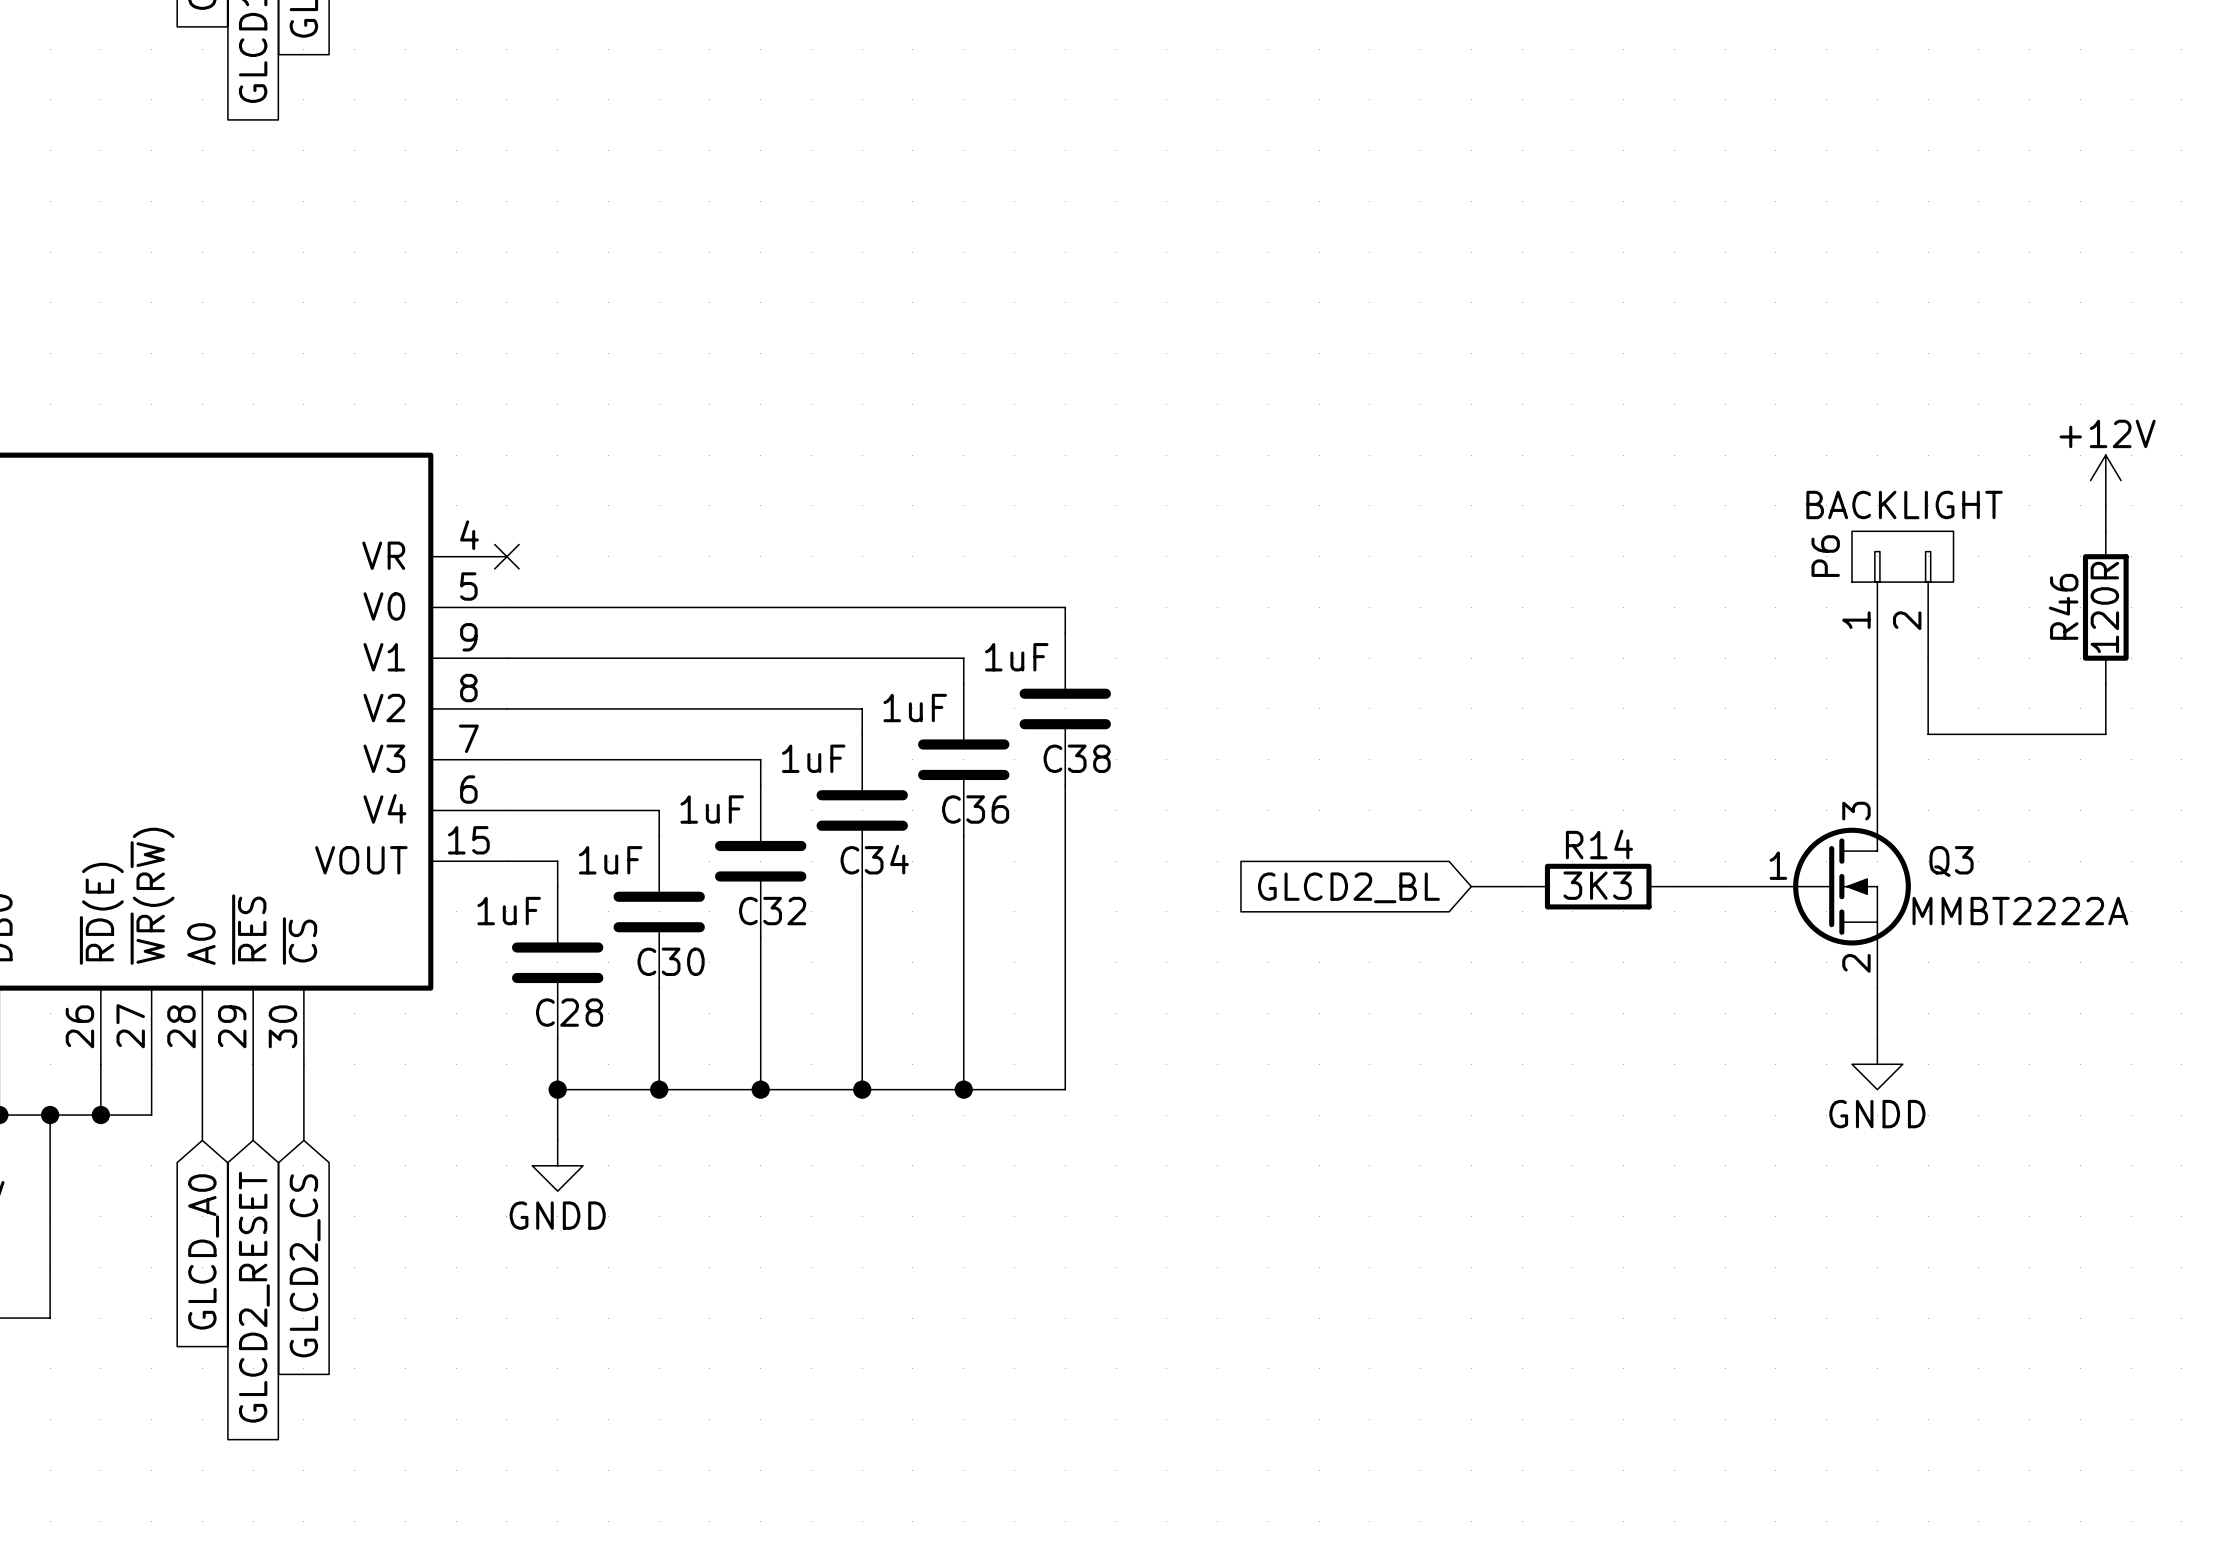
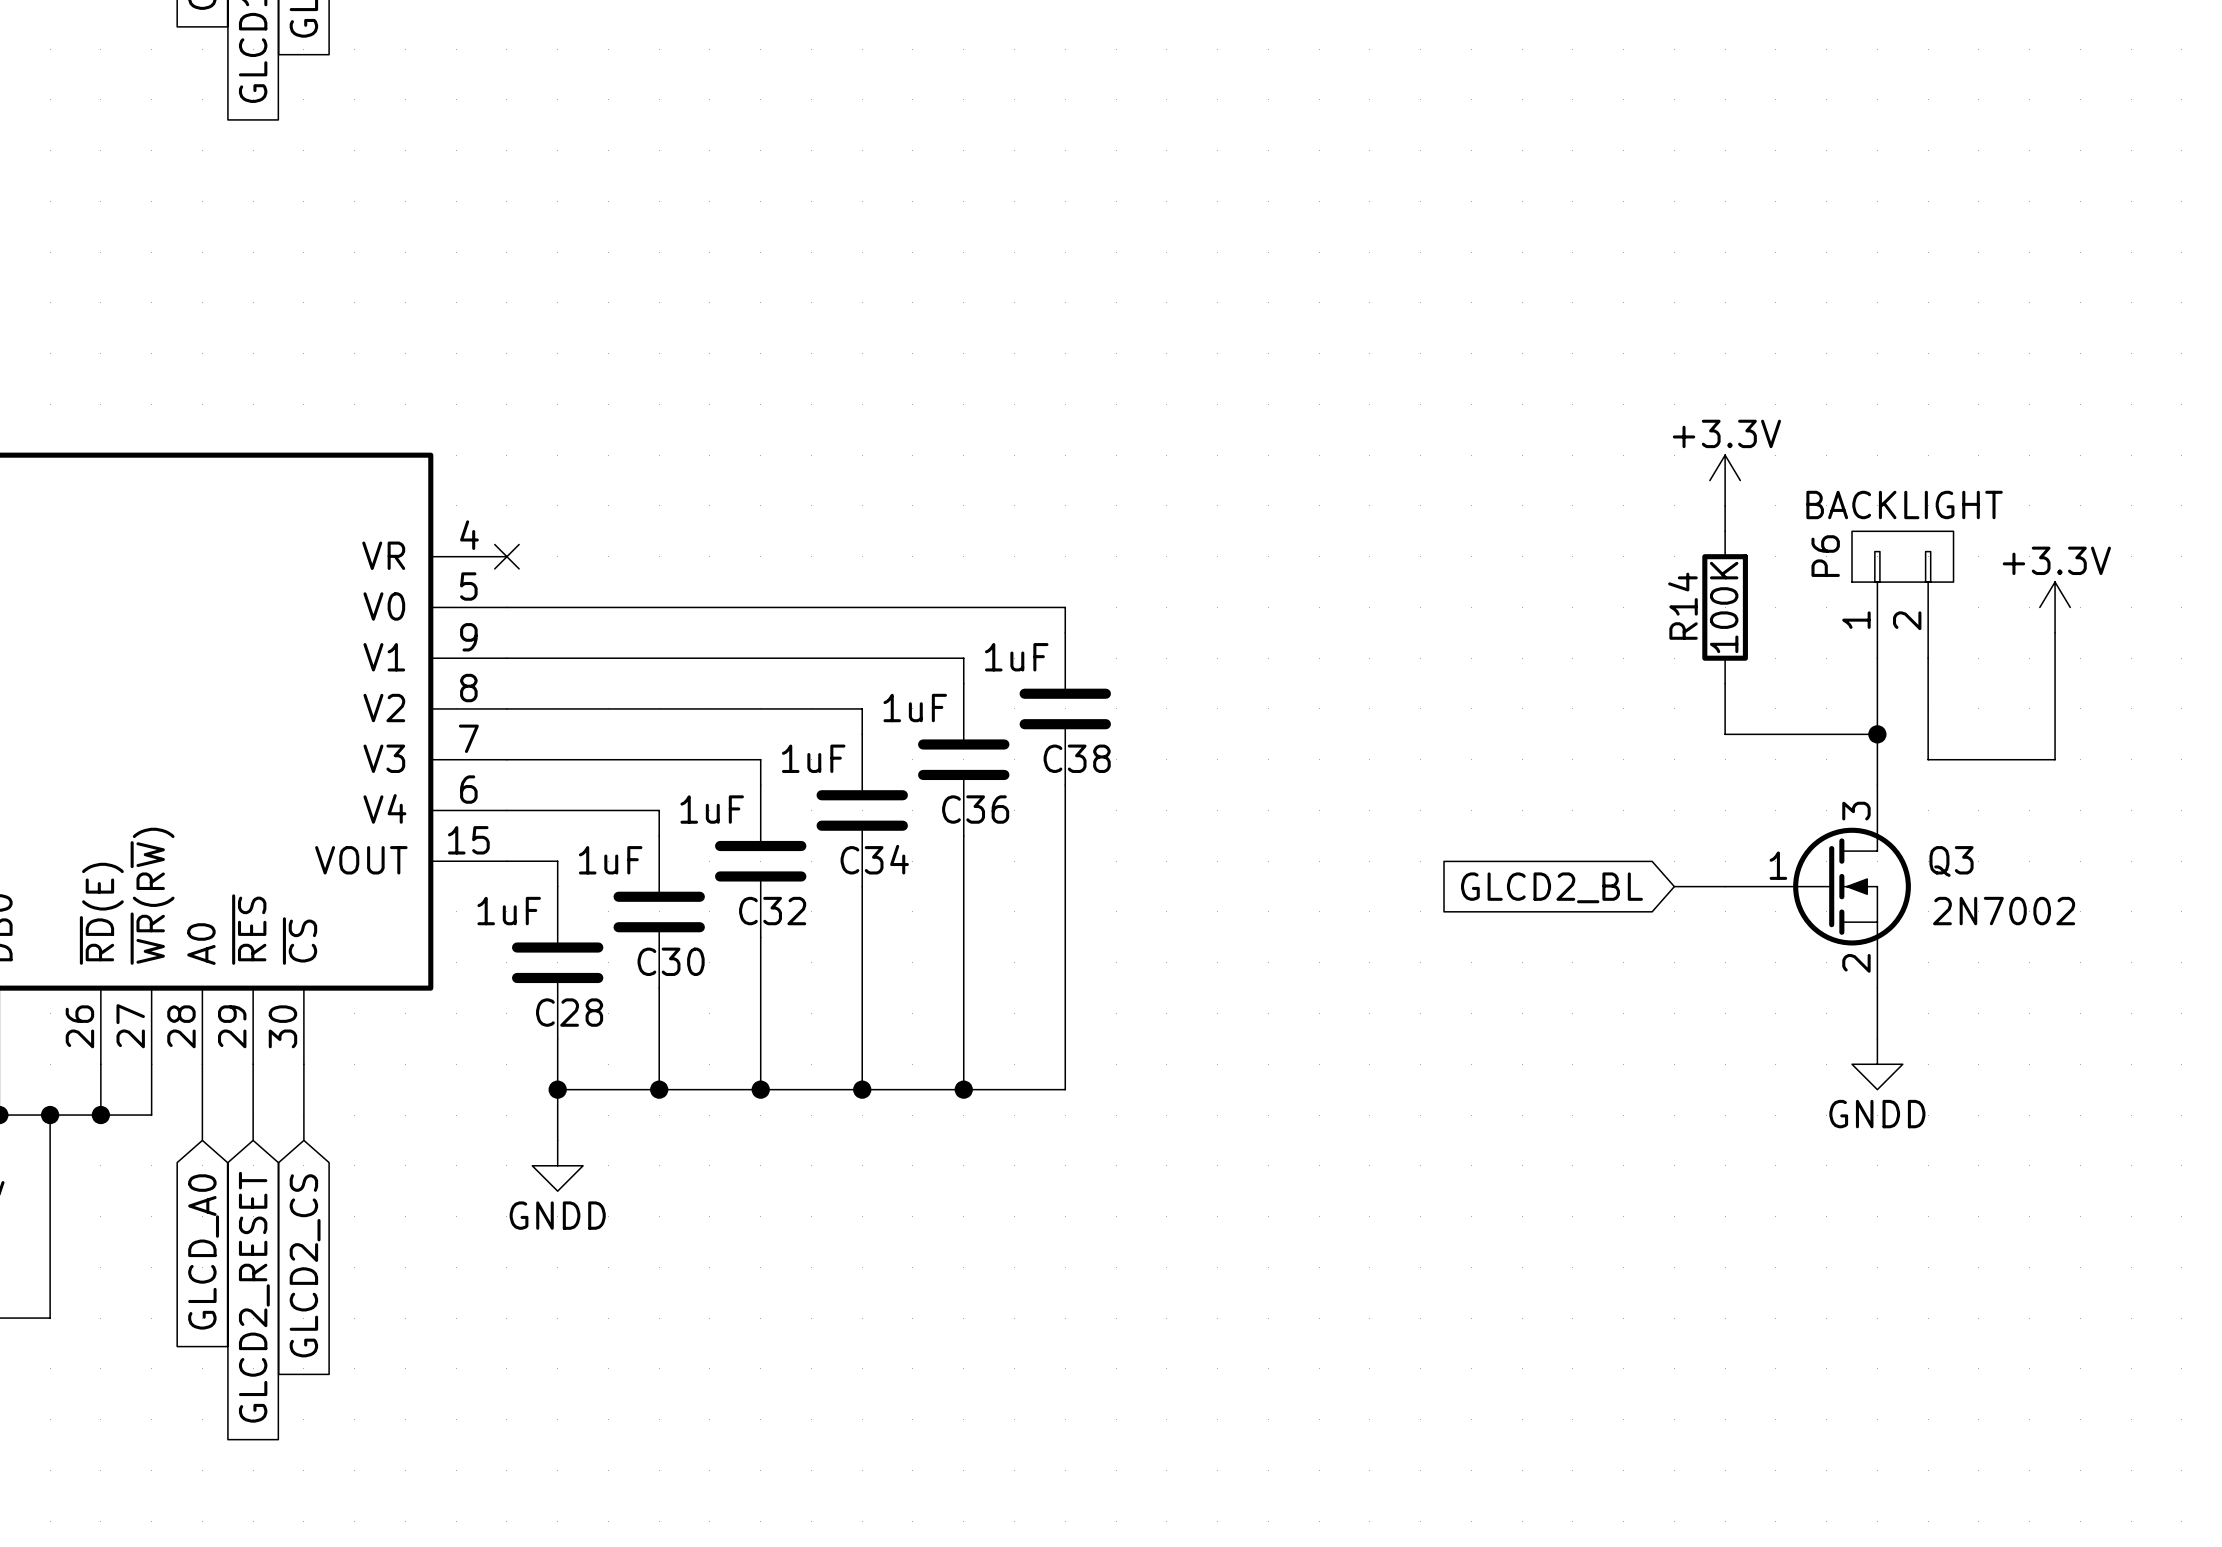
power symbol: none -> +3.3V (1725, 480)
power symbol: +12V (2105, 480) -> none
wire: (2105, 505) (2105, 531) -> (1725, 505) (1725, 531)
power symbol: none -> +3.3V (2055, 607)
R46: 120R (2105, 607) -> none
wire: none -> (1725, 683) (1725, 734) (1877, 734)
wire: (2105, 683) (2105, 734) (1928, 734) -> (2055, 632) (2055, 759) (1928, 759) (1928, 734)
junction: none -> (1877, 734)
R14 name position: R14 (1599, 844) -> R14 (1682, 606)
R14 value: 3K3 (1597, 885) -> 100K (1724, 607)
wire: (1471, 886) (1522, 886) -> none
R14 rotation: 0° (1598, 886) -> 90° clockwise (1725, 607)
R14 position: (1598, 886) -> (1725, 607)
global label position: GLCD2_BL (1348, 887) -> GLCD2_BL (1551, 887)
Q3 value: MMBT2222A (2020, 911) -> 2N7002 (2004, 911)

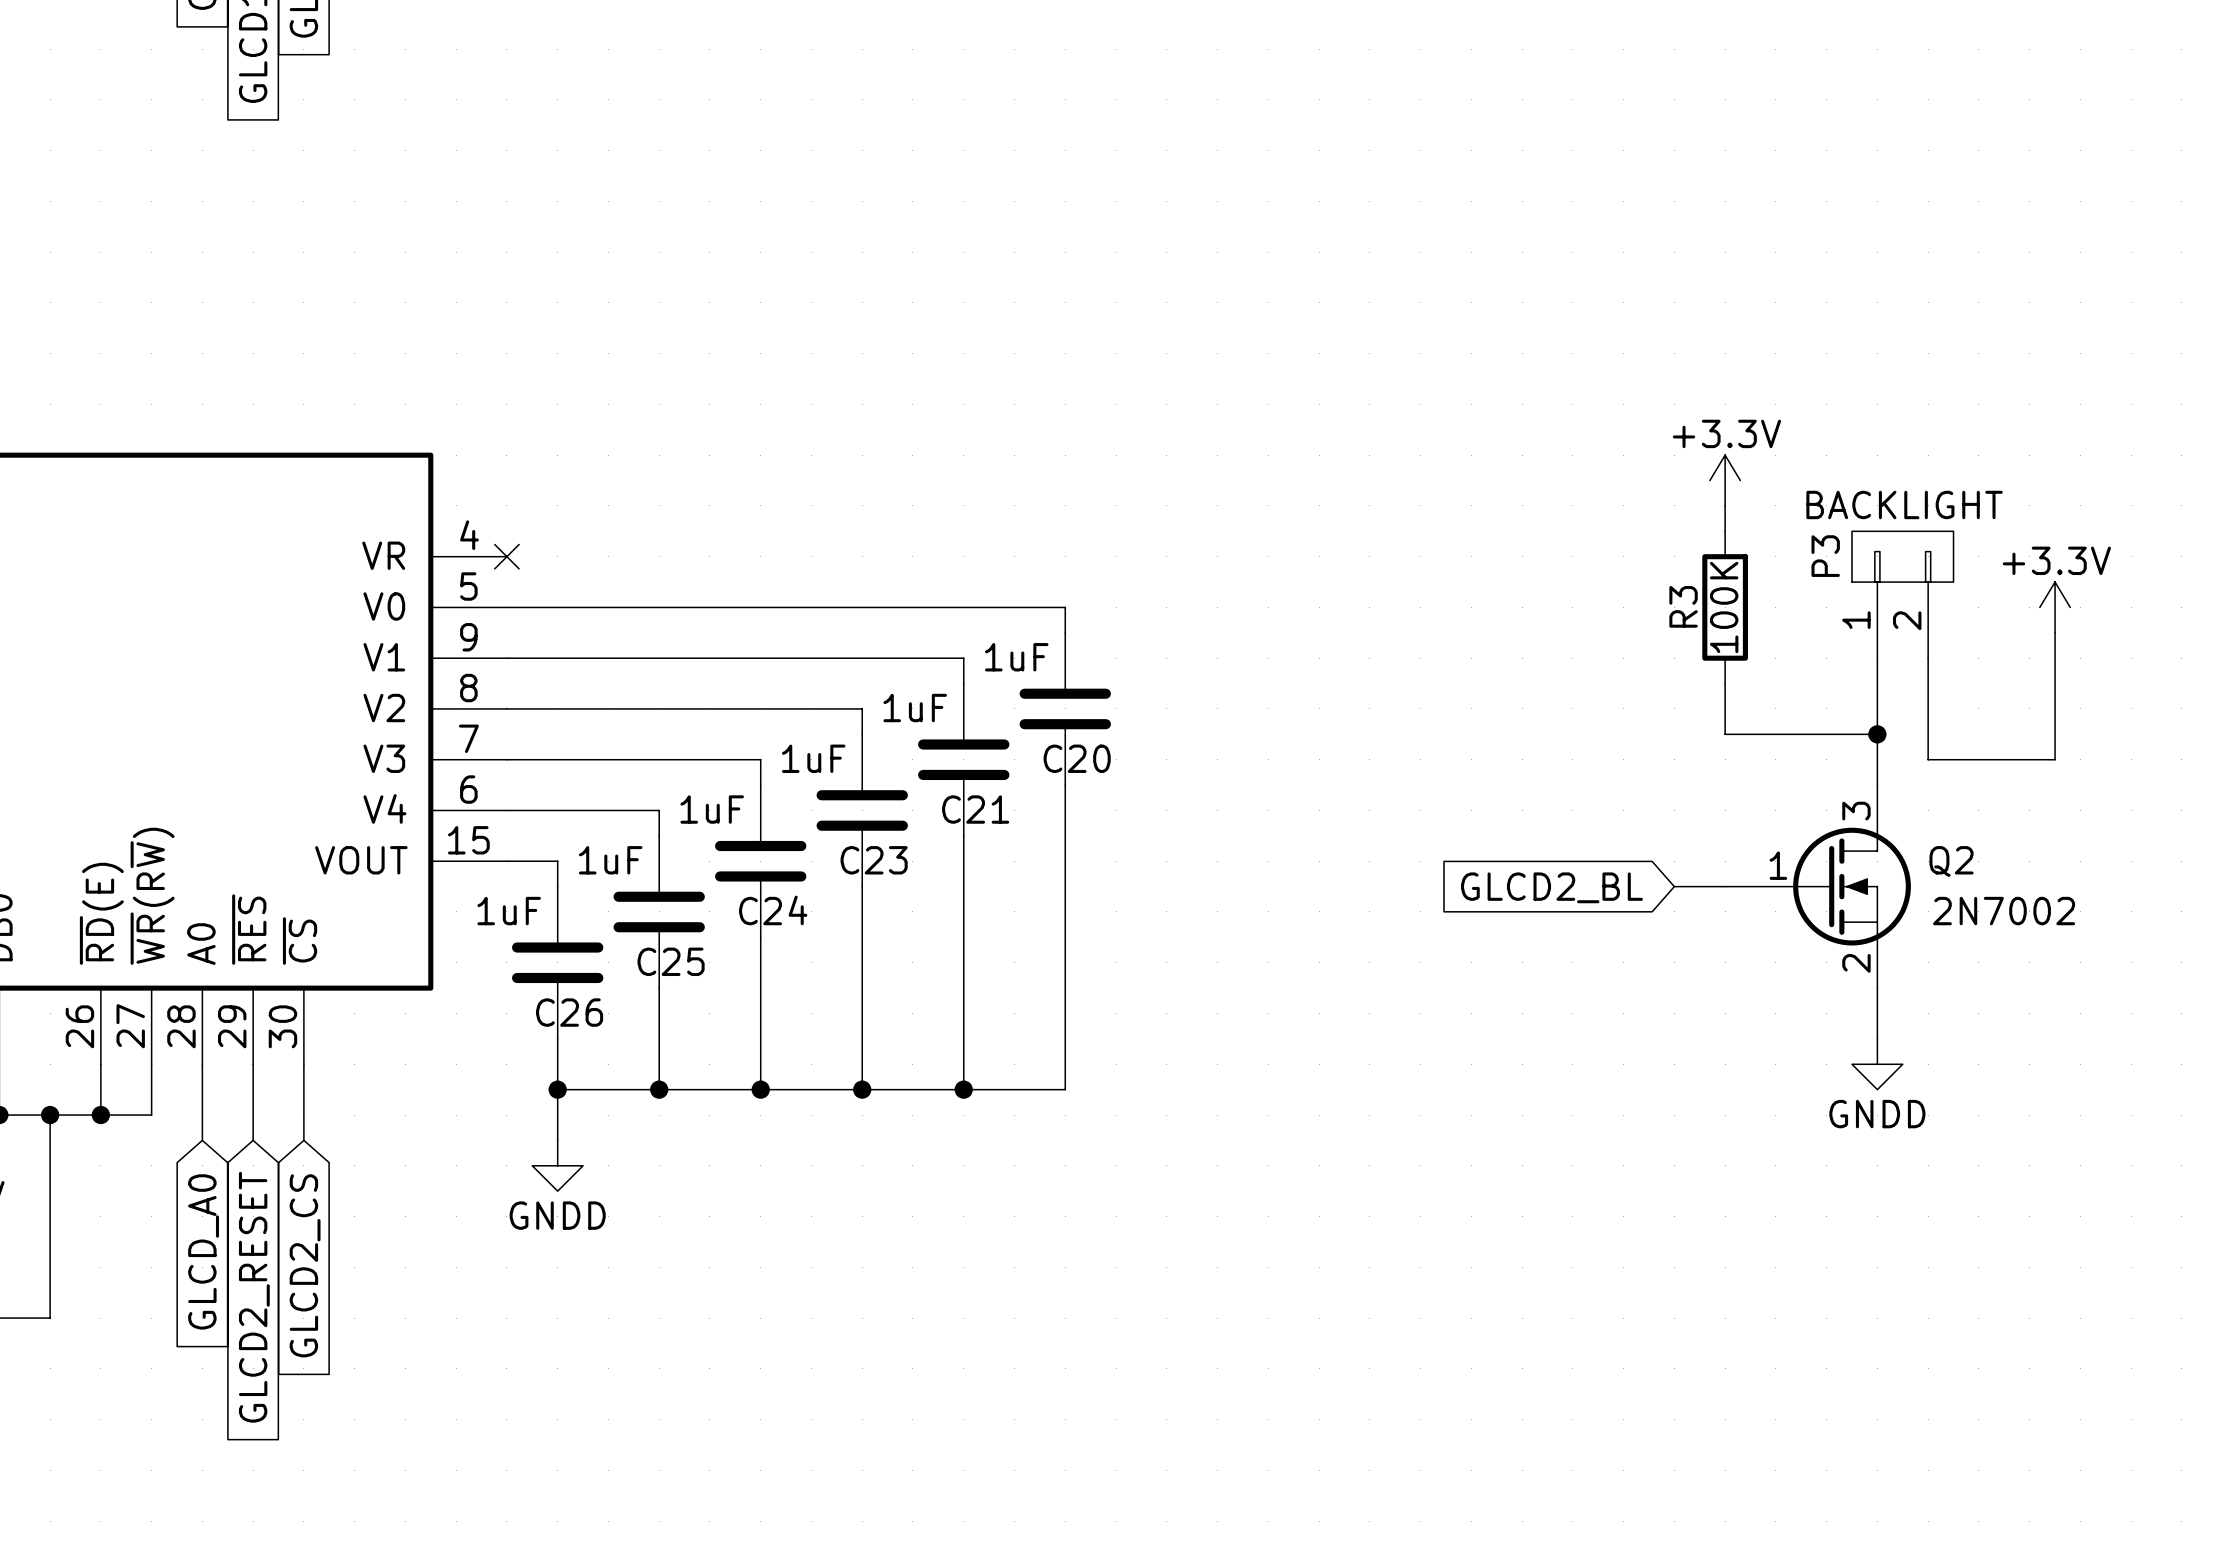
P6 name: P6 (1825, 556) -> P3 (1825, 556)
R14 name: R14 (1682, 606) -> R3 (1683, 606)
C38 name: C38 (1077, 758) -> C20 (1077, 758)
C36 name: C36 (975, 809) -> C21 (975, 809)
C34 name: C34 (874, 859) -> C23 (874, 860)
Q3 name: Q3 (1951, 861) -> Q2 (1951, 861)
C32 name: C32 (772, 911) -> C24 (773, 910)
C30 name: C30 (671, 961) -> C25 (671, 961)
C28 name: C28 (569, 1012) -> C26 (569, 1012)

